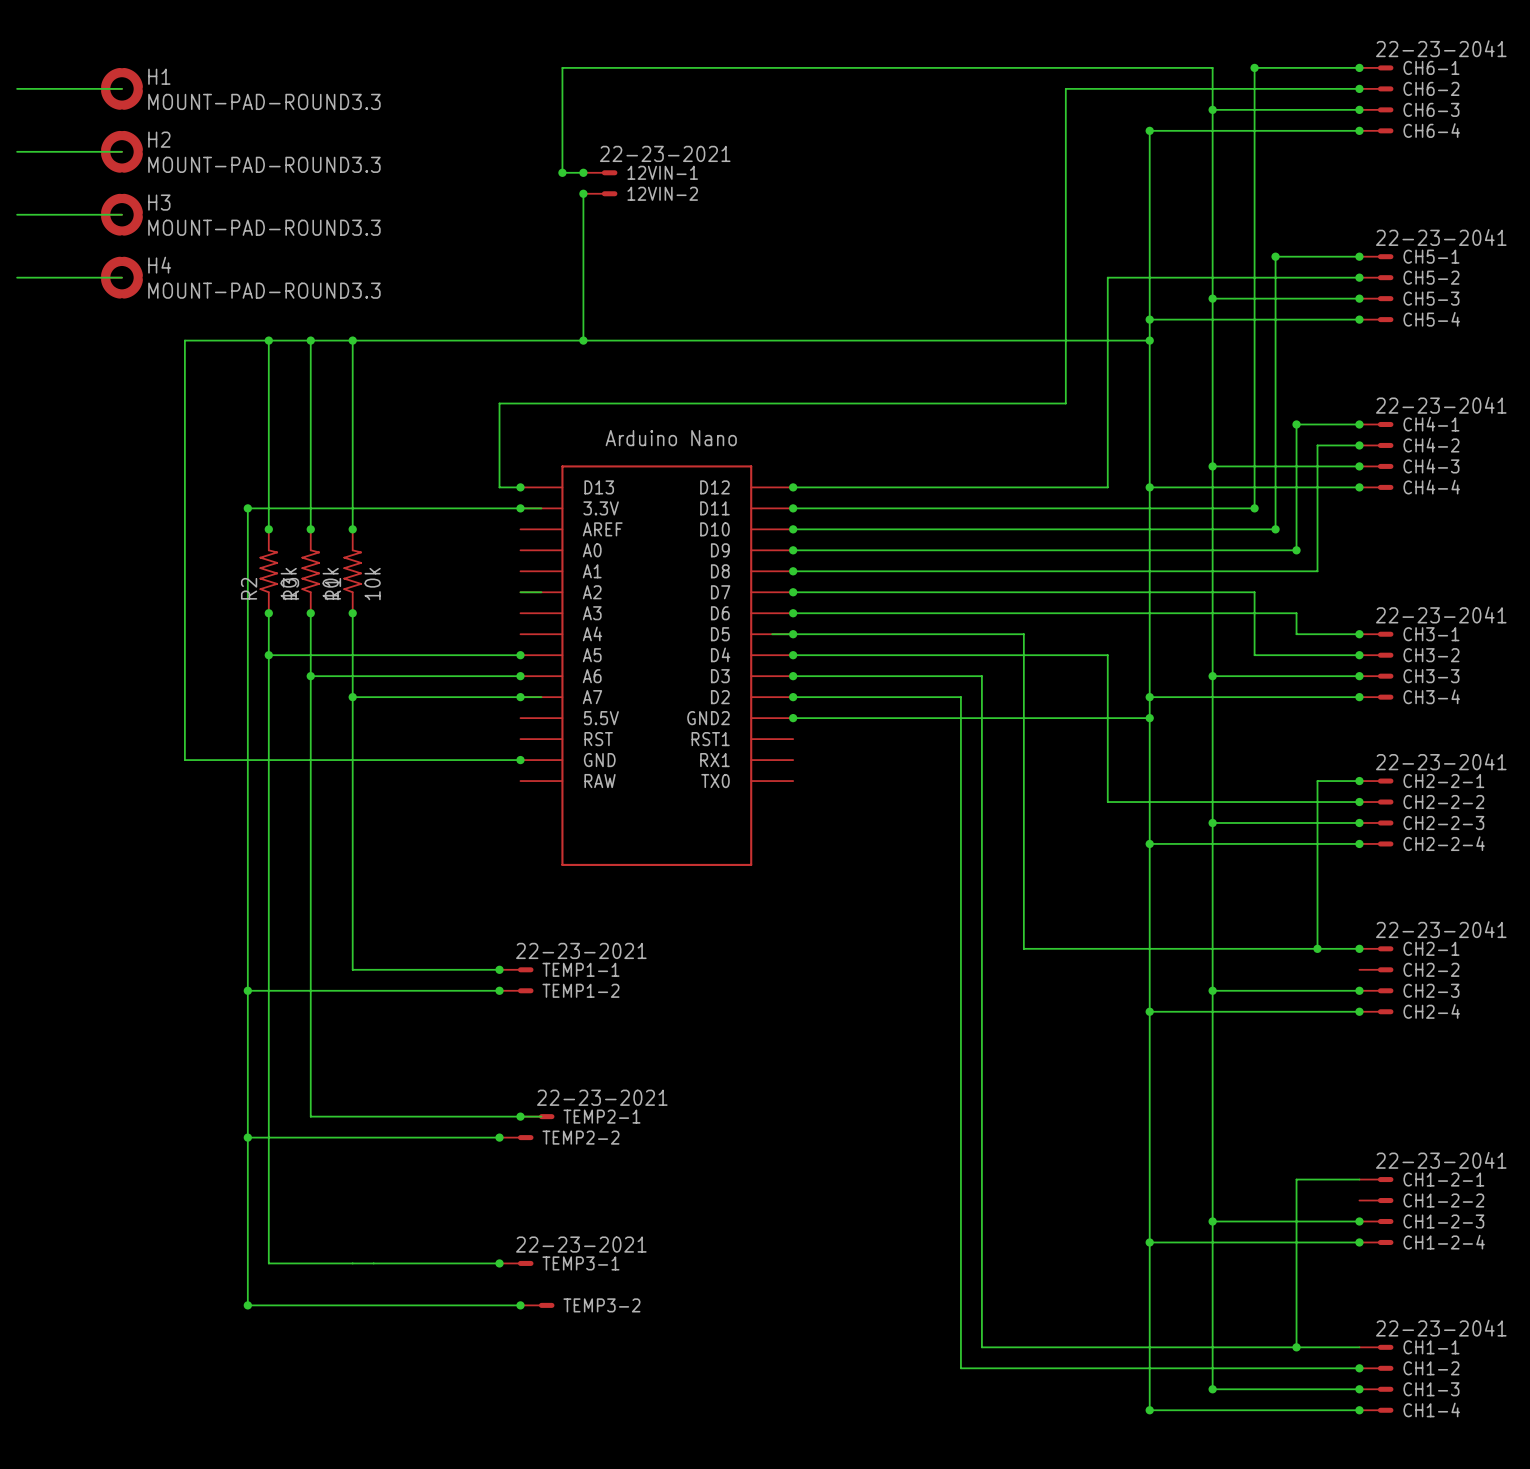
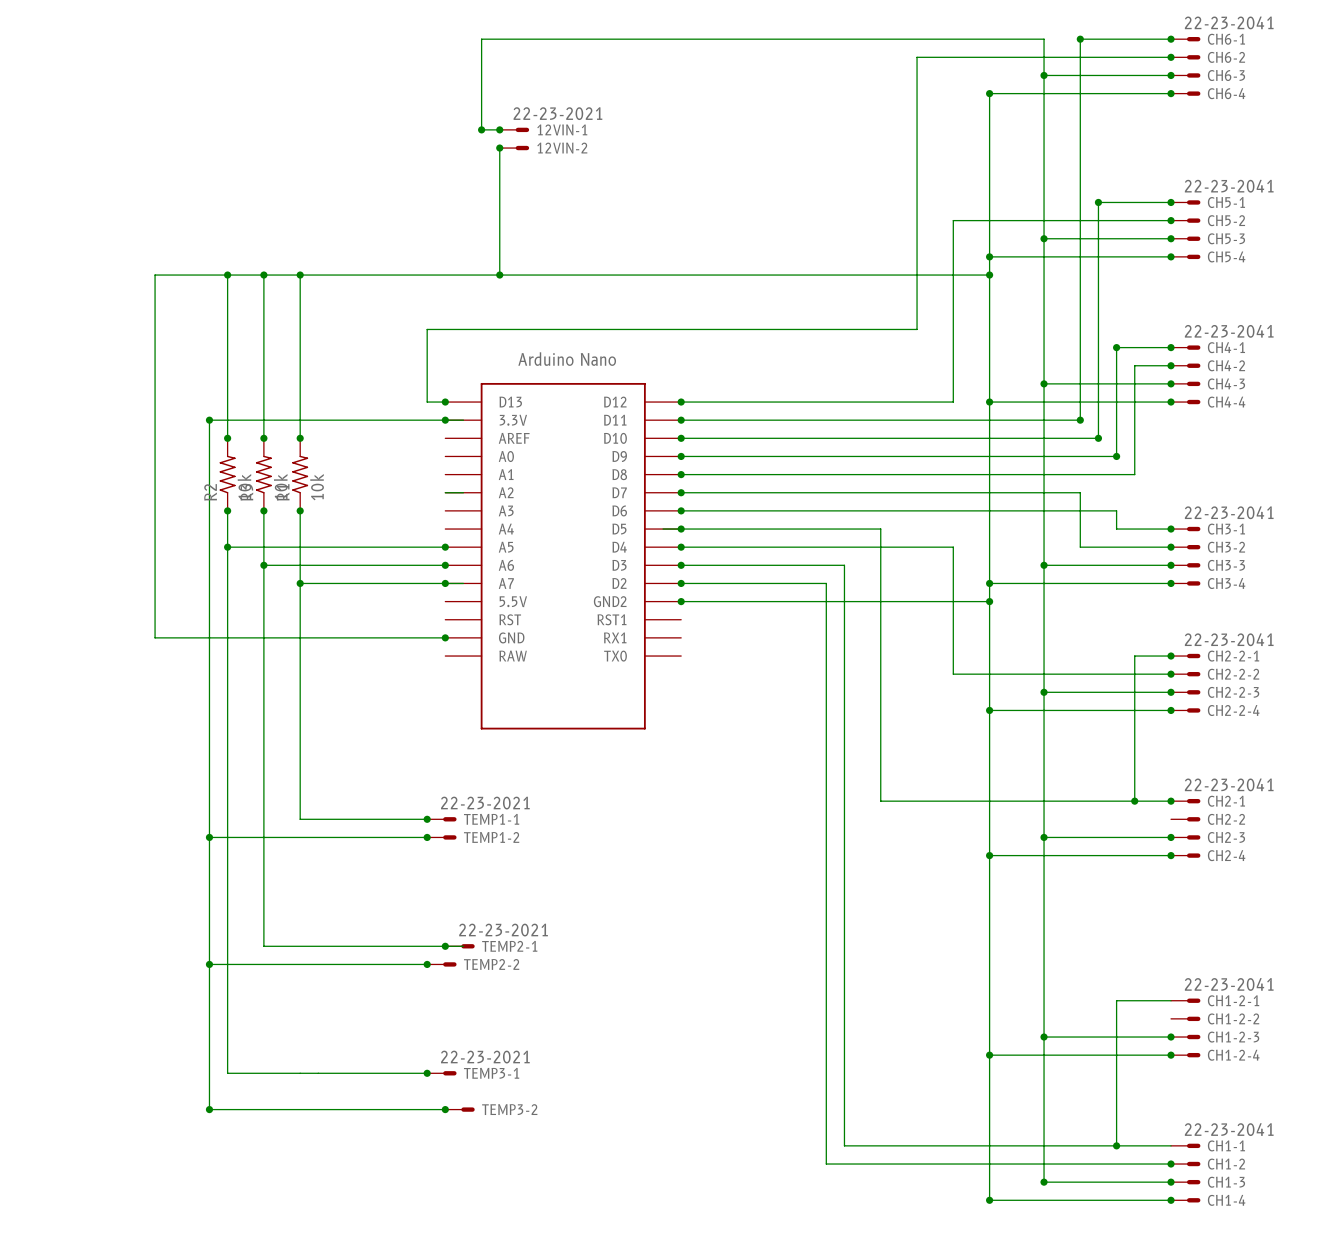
wire: (17, 88) (121, 88) -> none
H1: MOUNT-PAD-ROUND3.3 (121, 88) -> none
wire: (17, 151) (121, 151) -> none
H2: MOUNT-PAD-ROUND3.3 (121, 151) -> none
wire: (17, 214) (121, 214) -> none
H3: MOUNT-PAD-ROUND3.3 (121, 214) -> none
wire: (17, 277) (121, 277) -> none
H4: MOUNT-PAD-ROUND3.3 (121, 277) -> none

